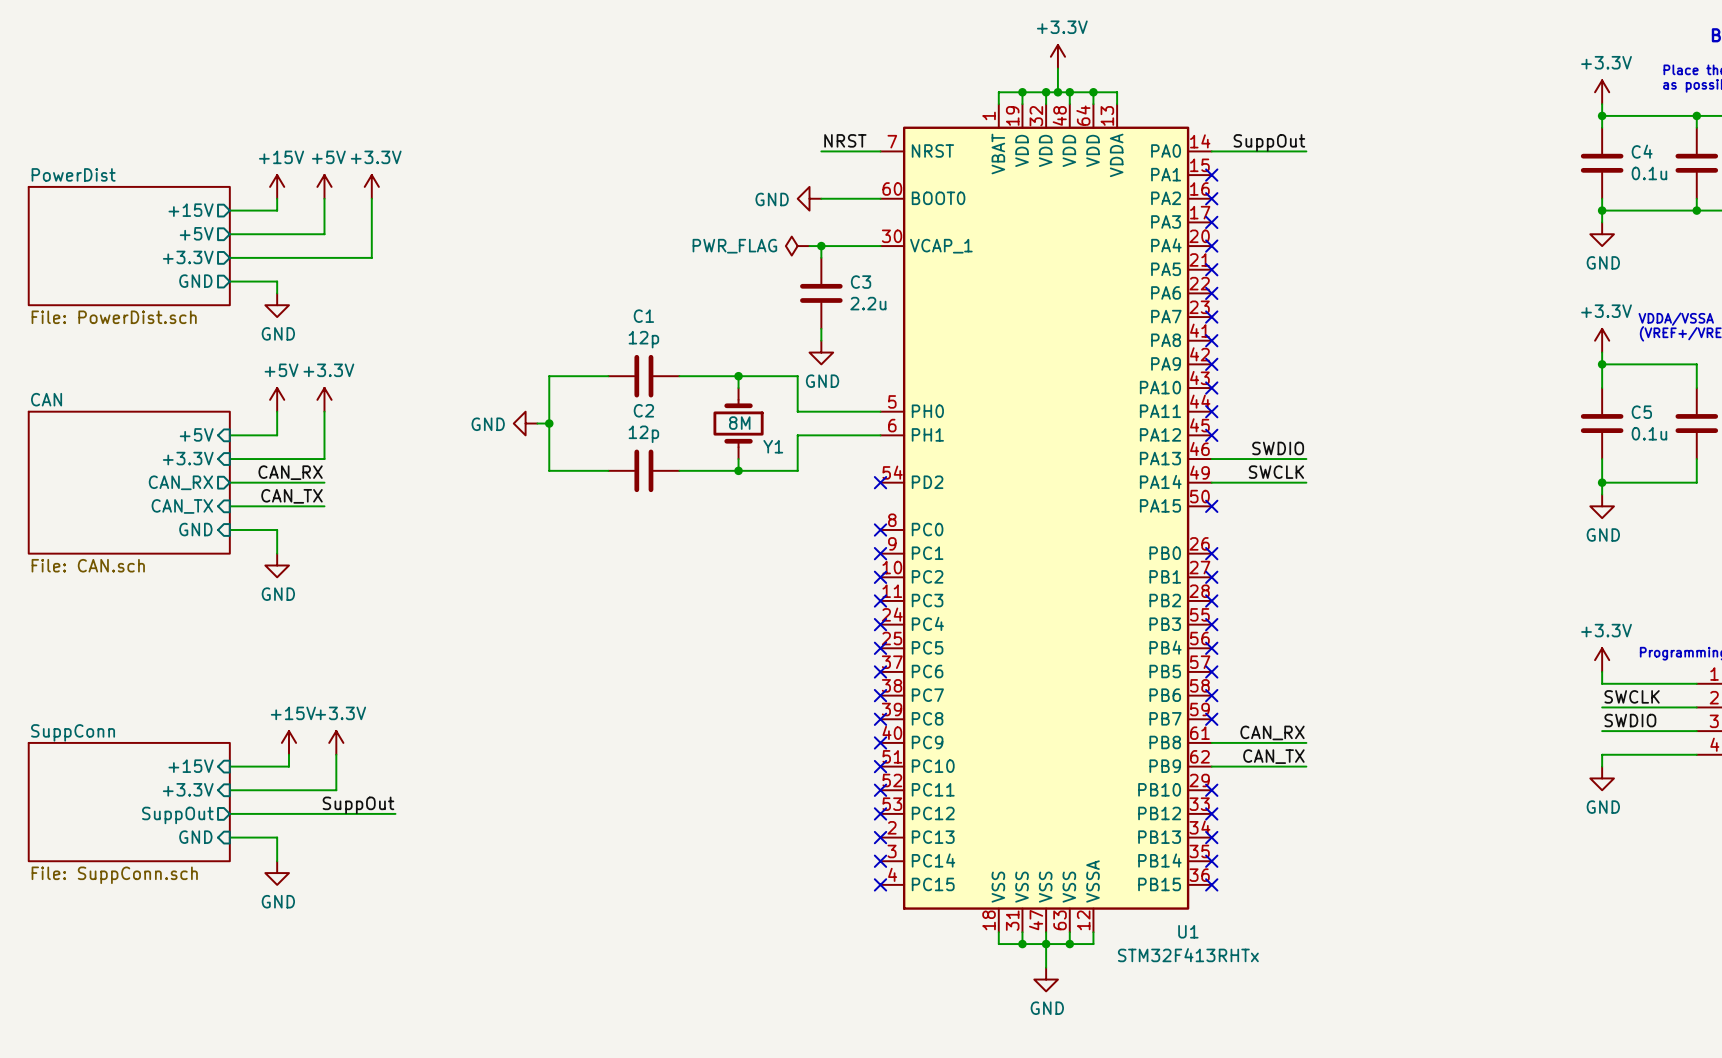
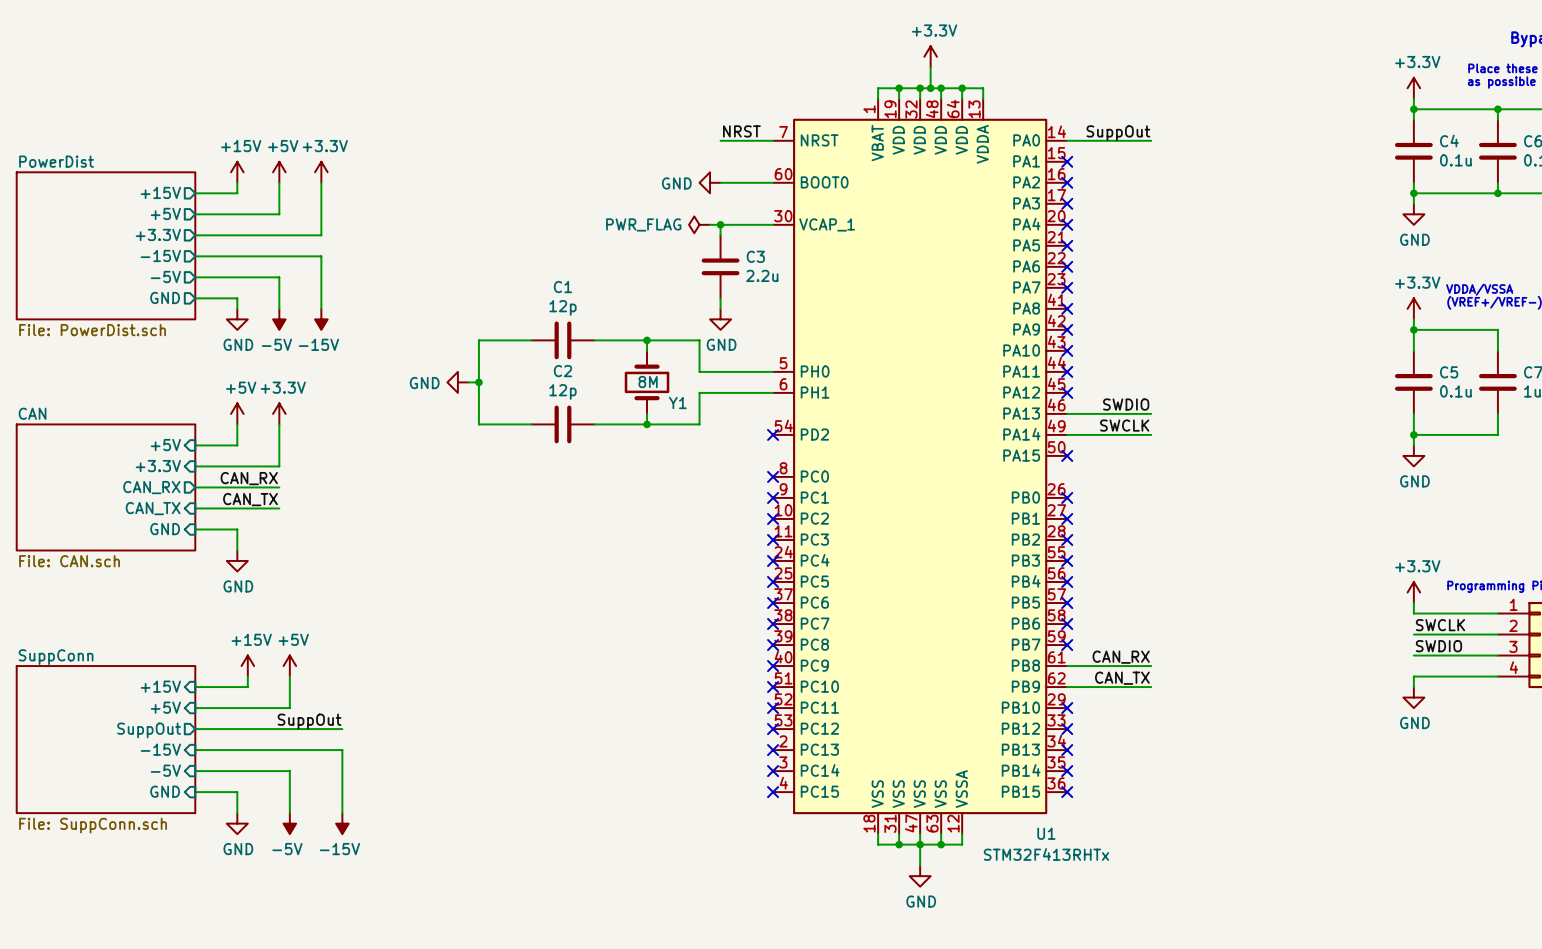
sheet PowerDist: File: PowerDist.sch (129, 246) -> none
sheet PowerDist: none -> File: PowerDist.sch (106, 245)
sheet pin: GND (195, 281) -> -15V (160, 255)
wire: (277, 281) (277, 293) -> (237, 256) (321, 256) (321, 308)
sheet pin: none -> -5V (165, 276)
wire: none -> (195, 277) (279, 277) (279, 308)
power symbol position: GND (277, 305) -> GND (237, 319)
sheet pin: none -> GND (165, 297)
wire: none -> (195, 298) (237, 298) (237, 308)
power symbol: none -> -5V (279, 319)
power symbol: none -> -15V (321, 319)
power symbol position: +5V (277, 399) -> +5V (237, 413)
power symbol position: +3.3V (324, 399) -> +3.3V (279, 413)
wire: (277, 411) (277, 435) (229, 435) -> (237, 424) (237, 445) (195, 445)
wire: (324, 411) (324, 459) (229, 459) -> (279, 424) (279, 466) (195, 466)
sheet pin position: +5V (196, 434) -> +5V (165, 445)
sheet pin position: +3.3V (188, 458) -> +3.3V (158, 466)
label position: CAN_RX (290, 472) -> CAN_RX (249, 478)
sheet CAN position: (129, 482) -> (106, 487)
sheet pin position: CAN_RX (180, 482) -> CAN_RX (151, 487)
wire: (229, 482) (324, 482) -> (195, 487) (279, 487)
label position: CAN_TX (292, 496) -> CAN_TX (250, 499)
sheet pin position: CAN_TX (182, 506) -> CAN_TX (153, 508)
wire: (229, 506) (324, 506) -> (195, 508) (279, 508)
sheet pin position: GND (195, 529) -> GND (165, 529)
wire: (229, 529) (277, 529) (277, 553) -> (195, 529) (237, 529) (237, 550)
power symbol position: GND (277, 565) -> GND (237, 560)
power symbol: +3.3V (336, 742) -> +5V (289, 666)
sheet pin: +3.3V (188, 789) -> +5V (165, 707)
sheet SuppConn: File: SuppConn.sch (129, 802) -> none
sheet SuppConn: none -> File: SuppConn.sch (106, 739)
sheet pin: GND (195, 837) -> -15V (160, 749)
wire: (277, 837) (277, 861) -> (237, 750) (342, 750) (342, 813)
sheet pin: none -> -5V (165, 770)
wire: none -> (195, 771) (289, 771) (289, 813)
power symbol position: GND (277, 873) -> GND (237, 823)
sheet pin: none -> GND (165, 791)
wire: none -> (195, 792) (237, 792) (237, 813)
power symbol: none -> -5V (289, 823)
power symbol: none -> -15V (342, 823)

